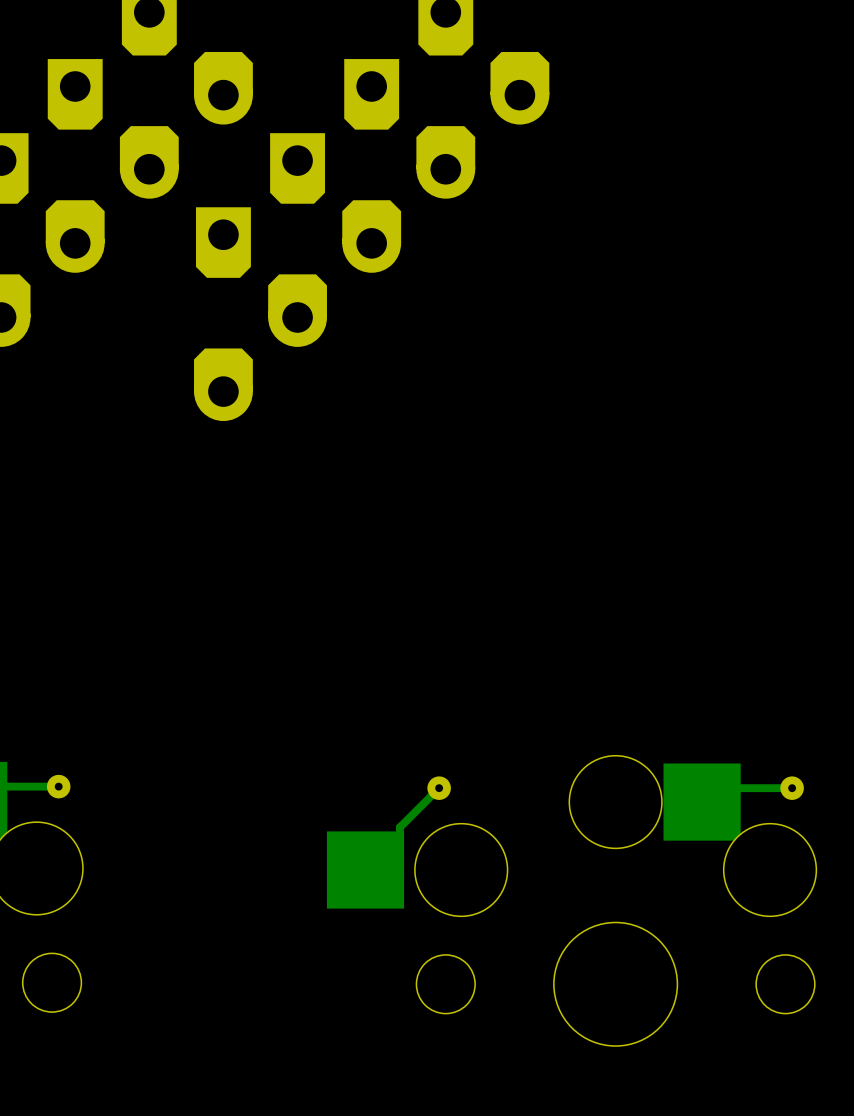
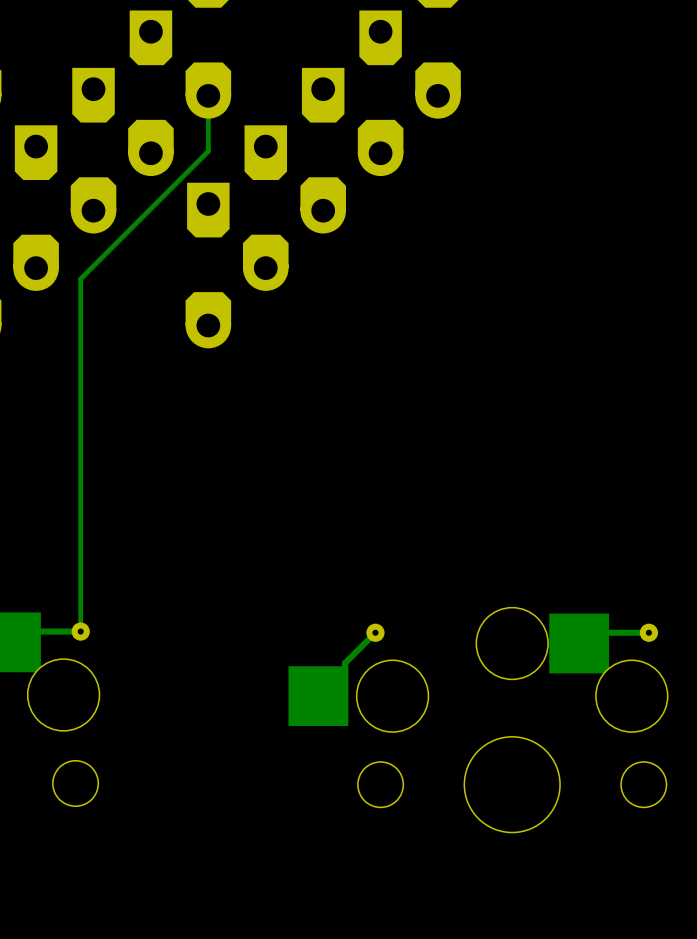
track: none -> (208, 95) (208, 151) (80, 278) (80, 621)

